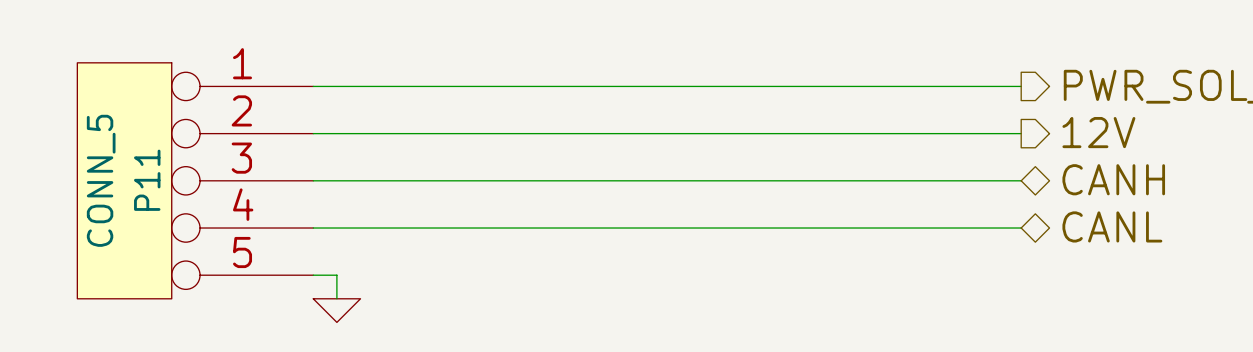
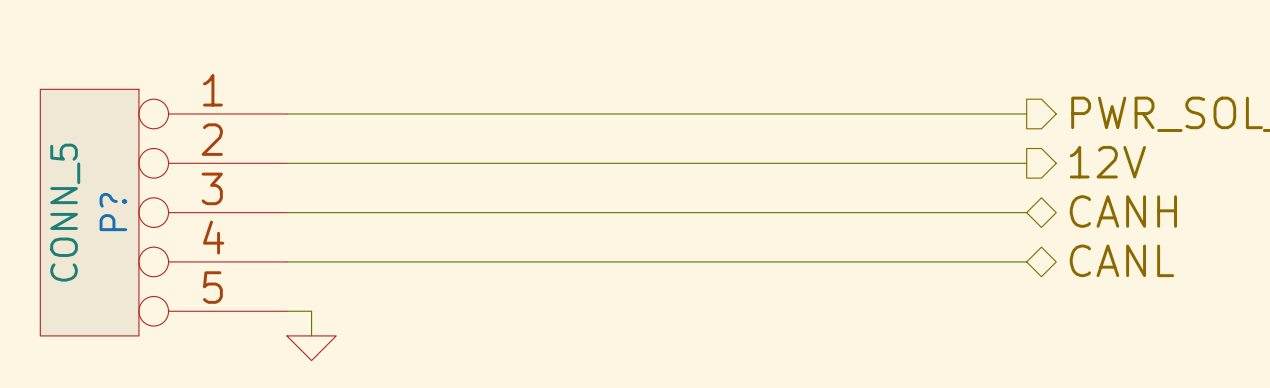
P11 name: P11 (147, 180) -> P? (113, 212)

